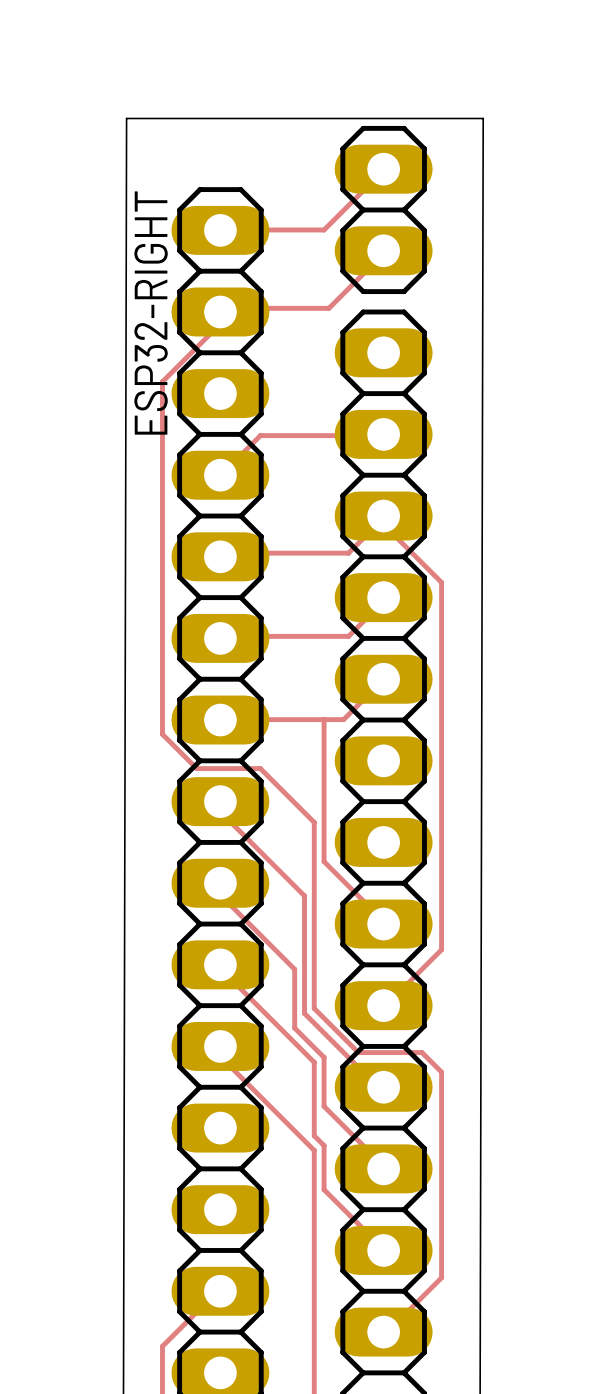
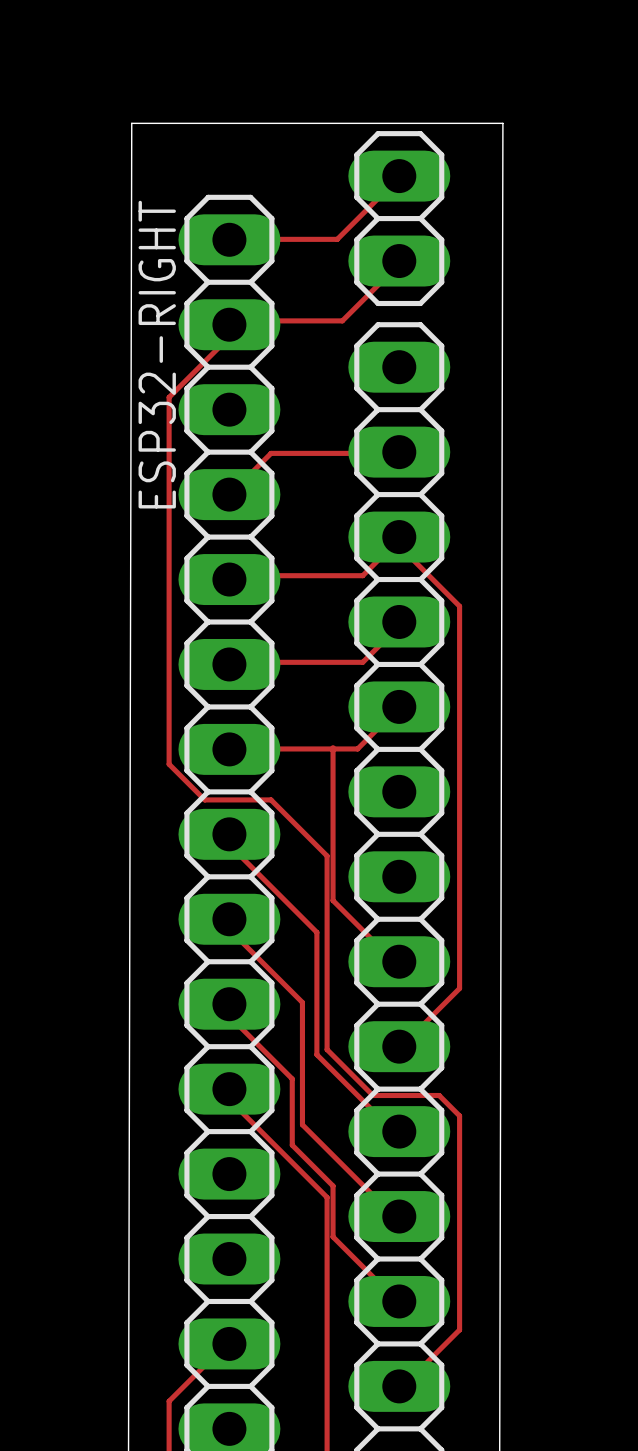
track: none -> (333, 747) (333, 900) (395, 961)
track: (324, 719) (324, 861) (382, 920) (383, 924) -> none
track: (220, 883) (221, 895) (294, 969) (294, 1028) (324, 1057) (324, 1106) (382, 1165) (383, 1168) -> (229, 919) (231, 931) (302, 1002) (302, 1124) (395, 1216)
track: (220, 964) (221, 969) (314, 1062) (314, 1135) (324, 1145) (324, 1189) (383, 1250) -> (229, 1004) (231, 1017) (292, 1078) (292, 1145) (333, 1185) (333, 1236) (394, 1298) (395, 1301)

